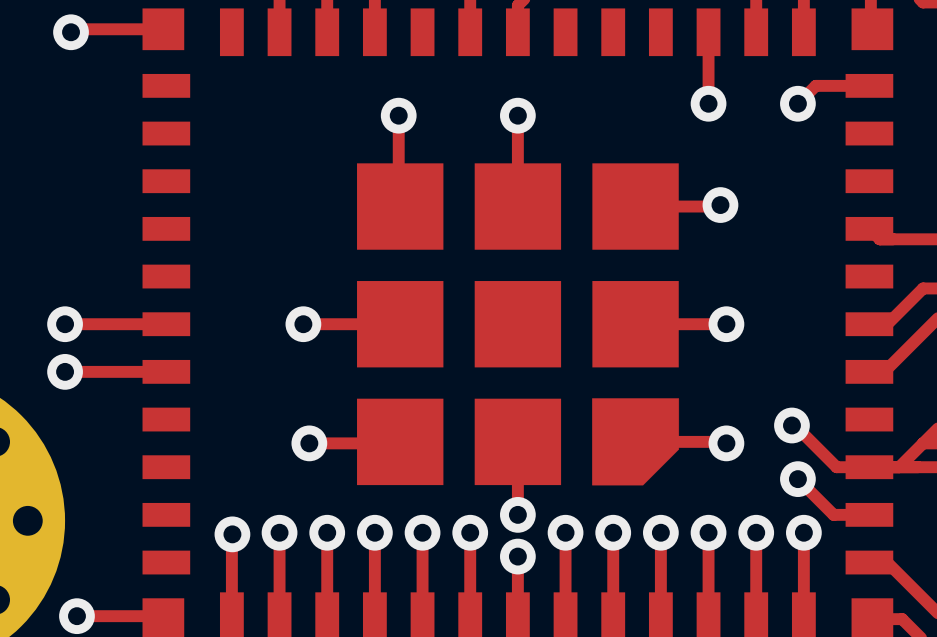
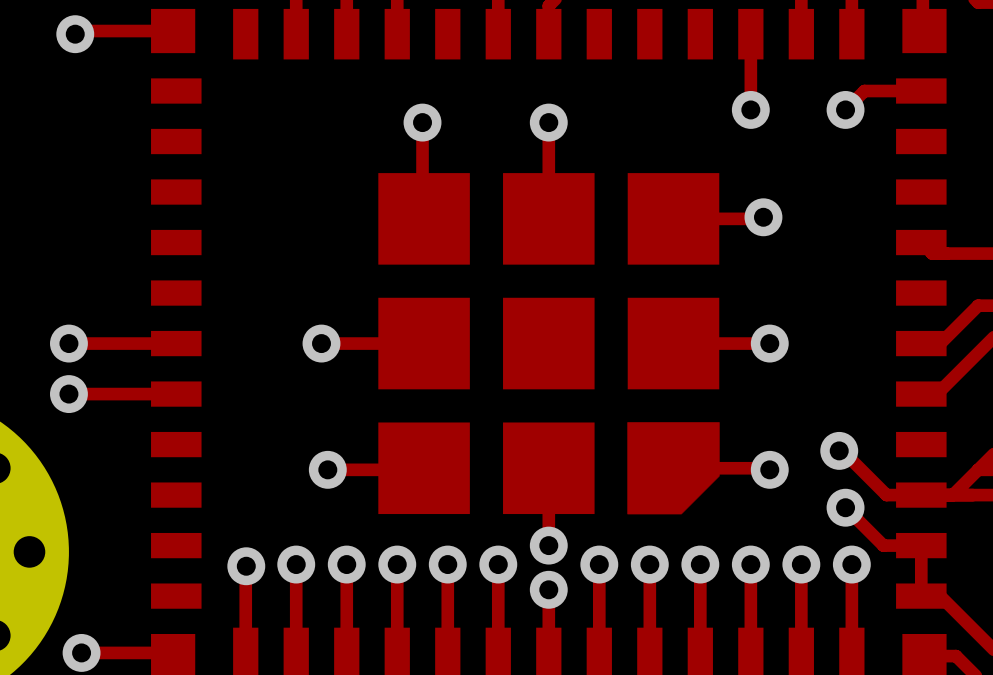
track: none -> (921, 545) (921, 596)

